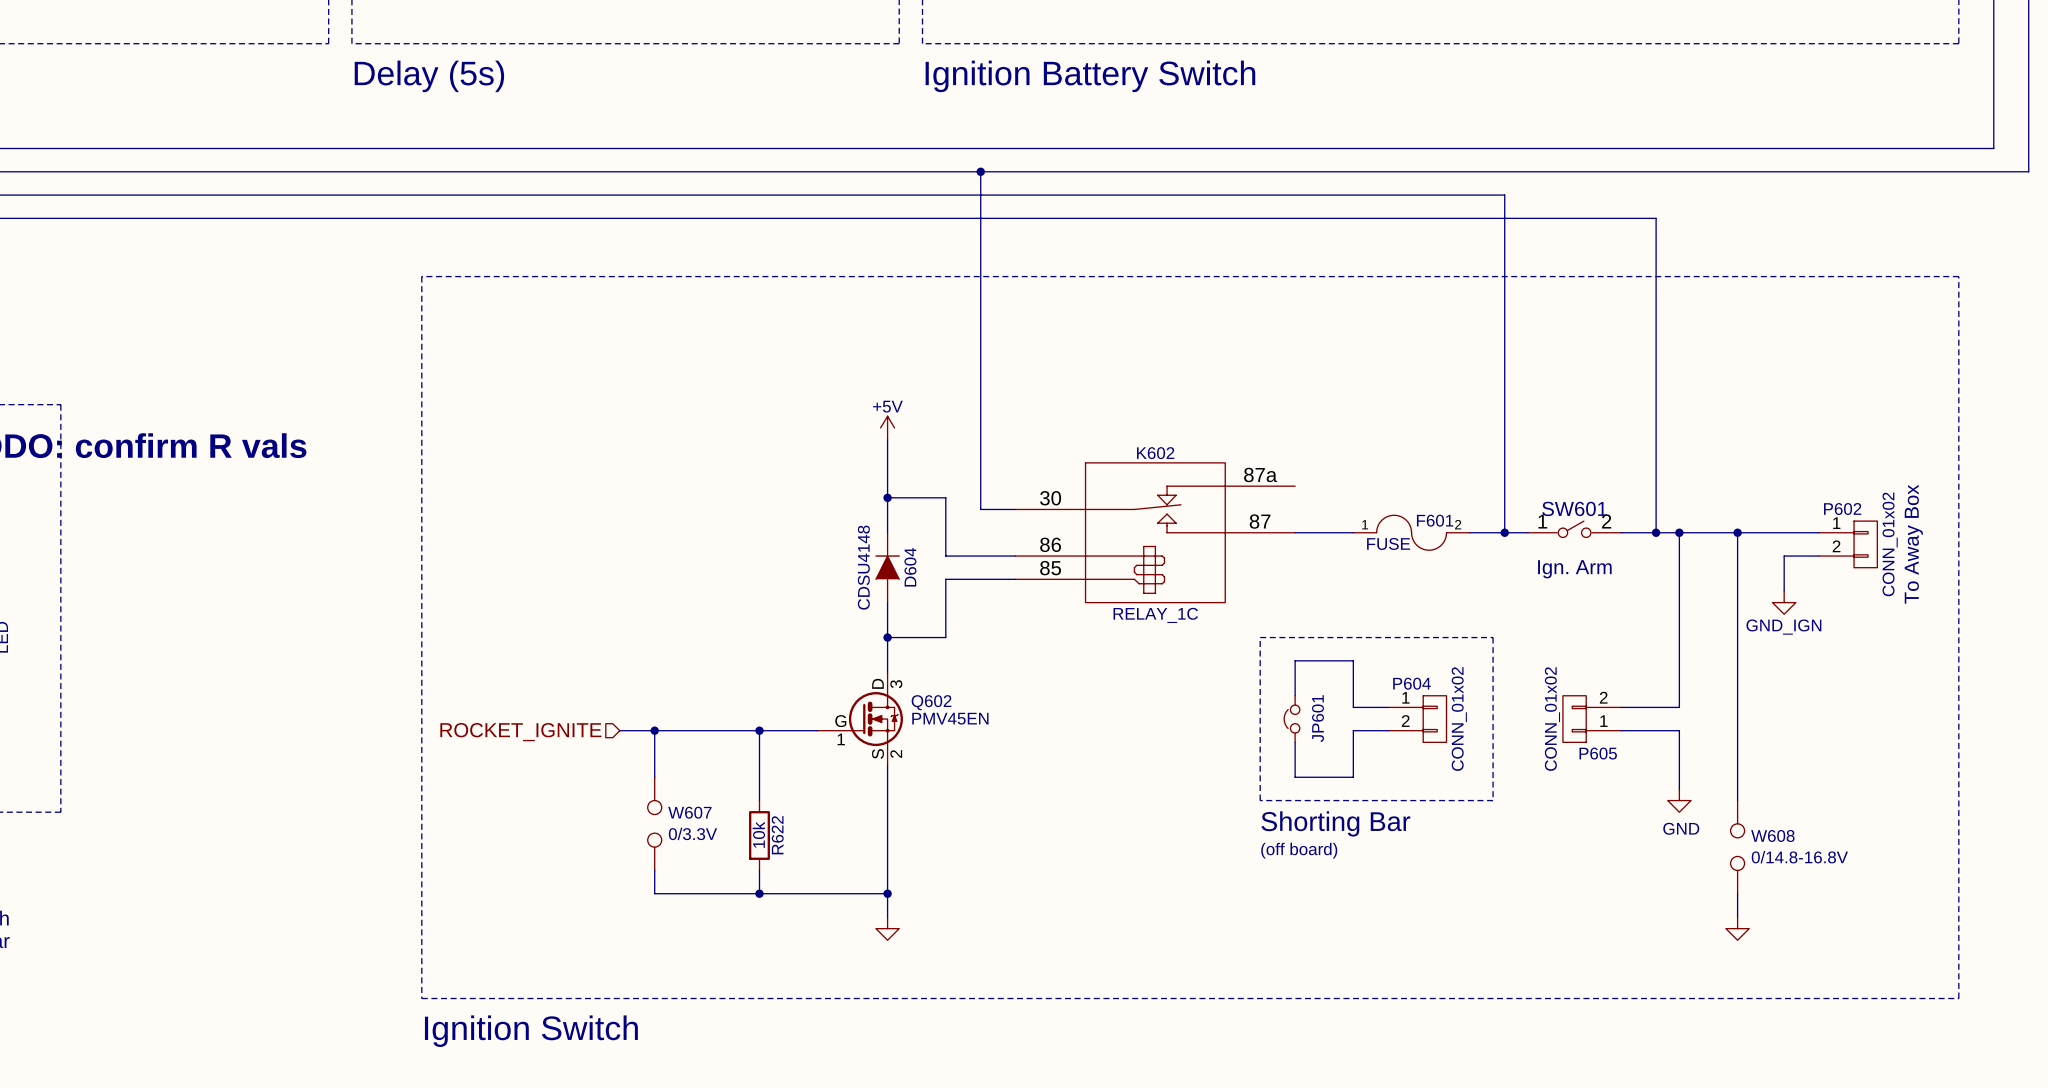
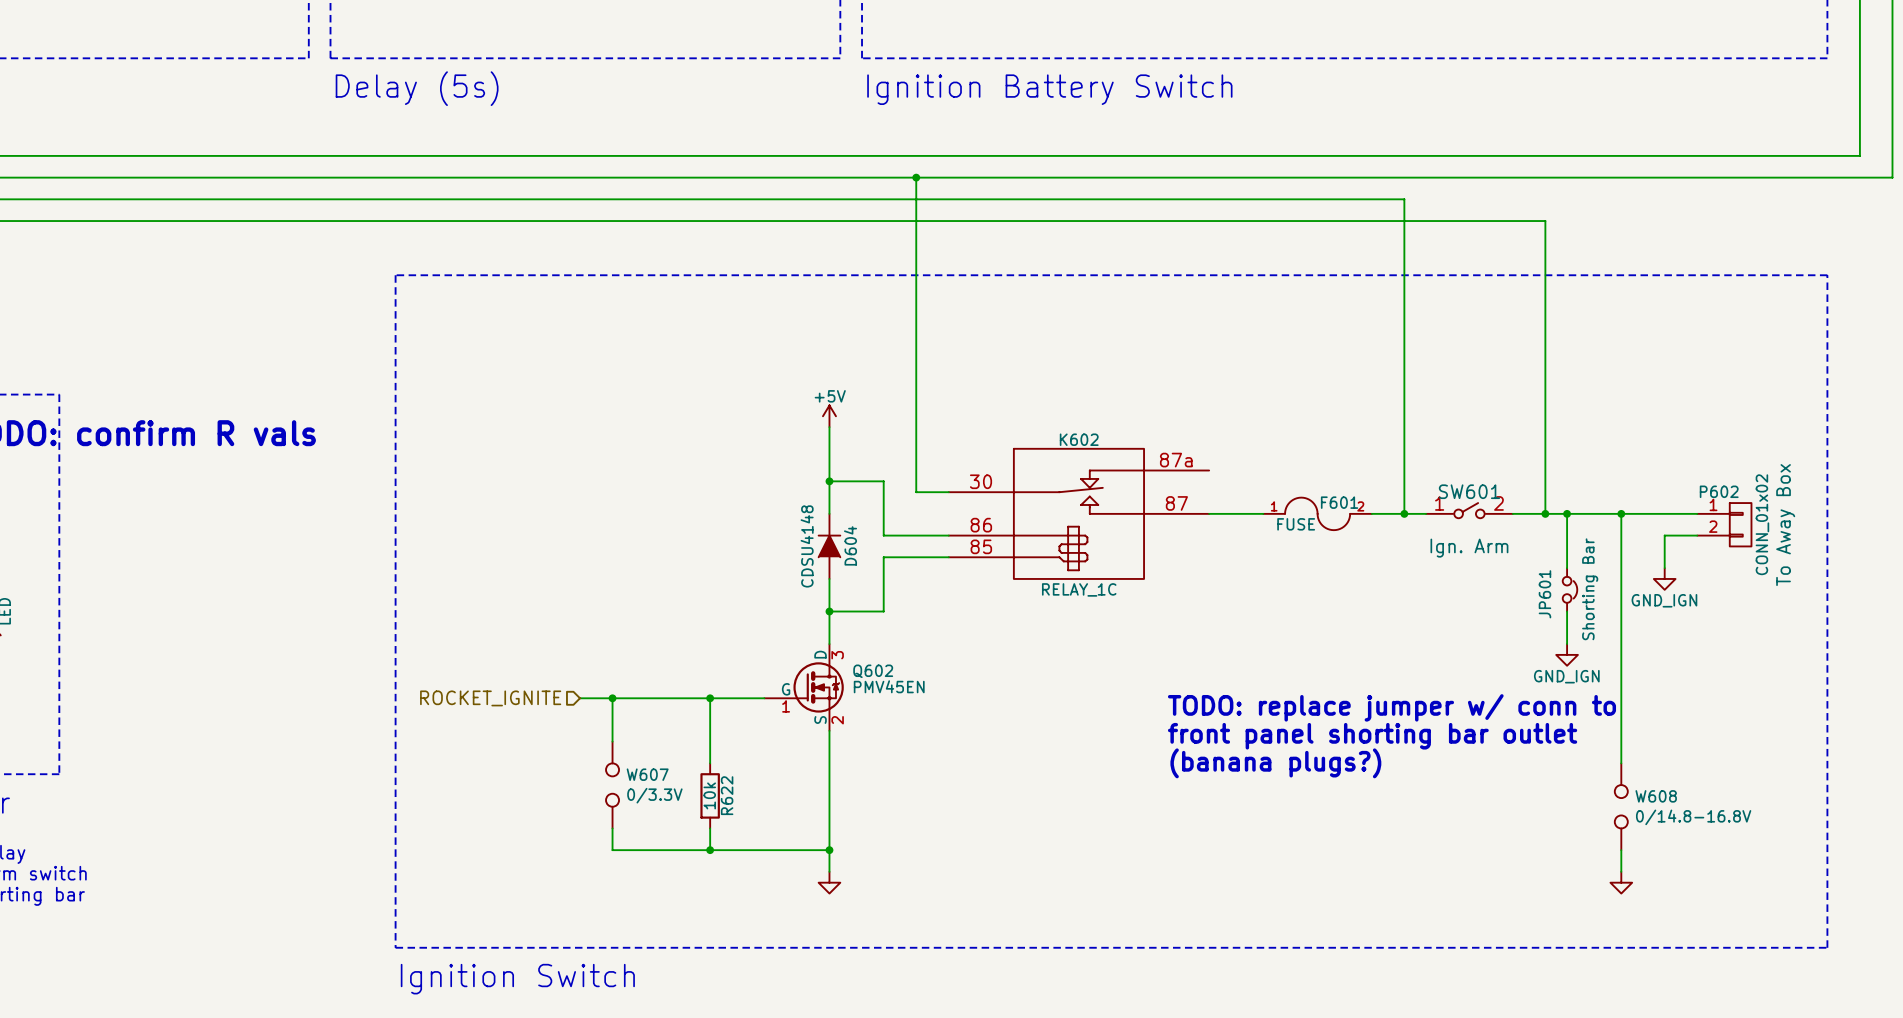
wire: (1679, 590) (1679, 637) -> none
JP601 value: none -> Shorting Bar (1590, 589)
line: (1260, 637) (1493, 637) (1493, 800) (1260, 800) (1260, 637) -> none
wire: (1679, 672) (1679, 707) (1621, 707) -> none
power symbol: none -> GND_IGN (1567, 654)
wire: (1295, 695) (1295, 660) (1353, 660) (1353, 707) (1388, 707) -> none
JP601 rotation: 0° (1291, 719) -> 180° (1570, 589)
JP601 position: (1291, 719) -> (1570, 589)
P604: CONN_01x02 (1417, 719) -> none
P605: CONN_01x02 (1592, 719) -> none
wire: (1388, 730) (1353, 730) (1353, 777) (1295, 777) (1295, 742) -> none
wire: (1621, 730) (1679, 730) (1679, 788) -> none
text: none -> TODO: replace jumper w/ conn to (1391, 707)
text: none -> front panel shorting bar outlet (1372, 736)
text: none -> (banana plugs?) (1275, 763)
power symbol: GND (1679, 800) -> none
text: Shorting Bar (1335, 823) -> none
text: (off board) (1299, 850) -> none

